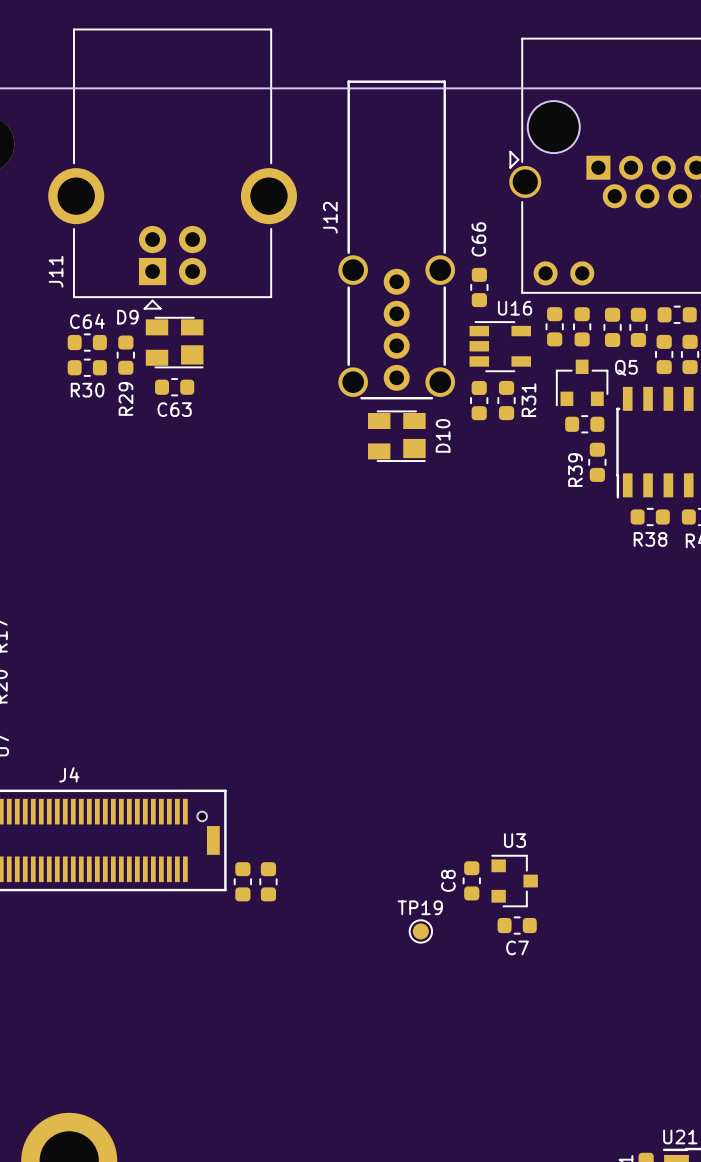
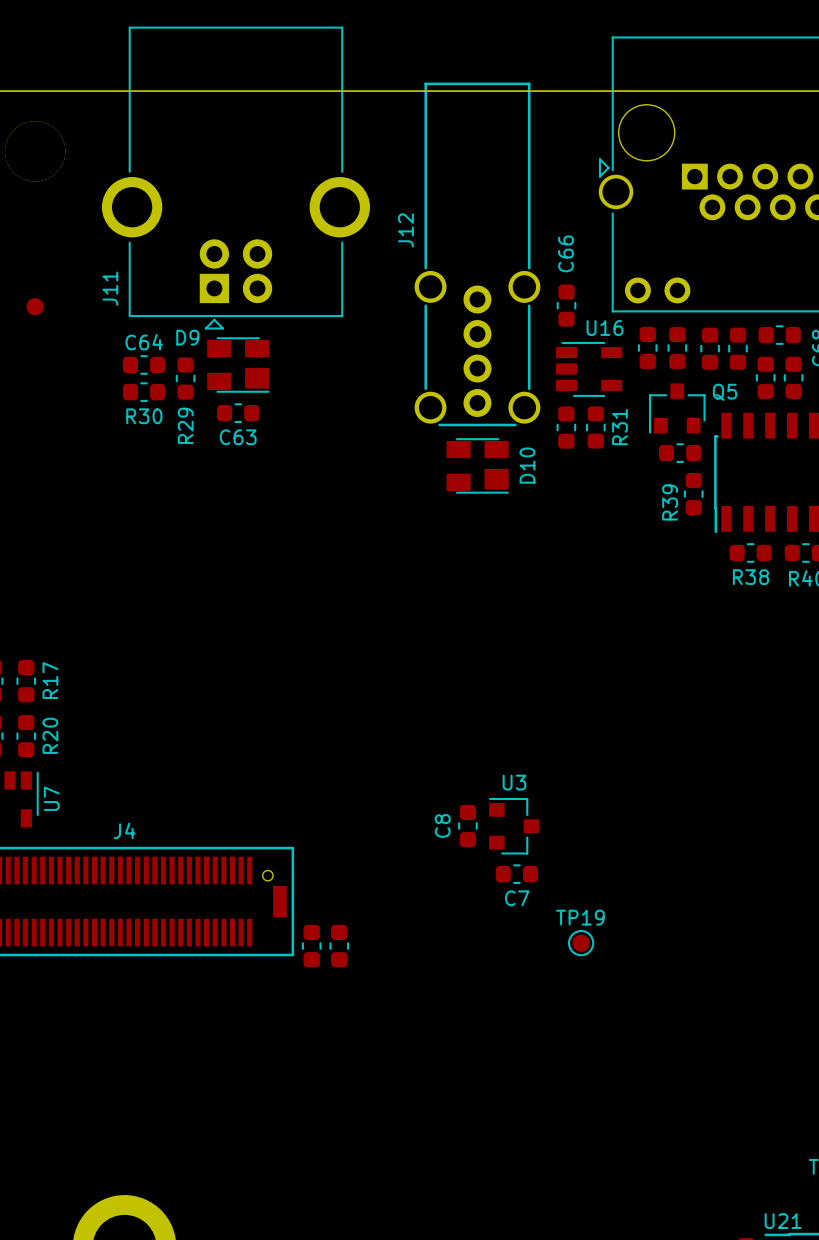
C8 position: (471, 880) -> (467, 826)
U3 position: (514, 881) -> (514, 826)
C7 position: (517, 925) -> (516, 874)
TP19 position: (420, 931) -> (581, 943)

